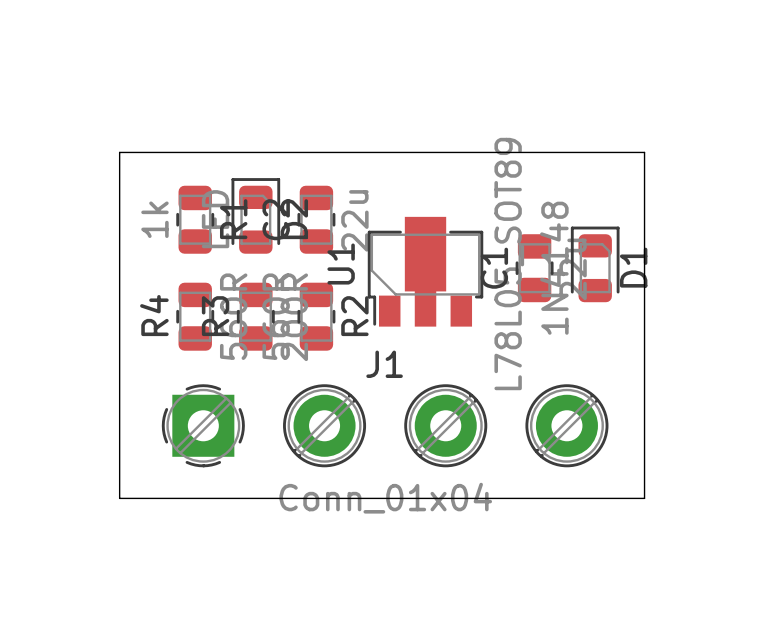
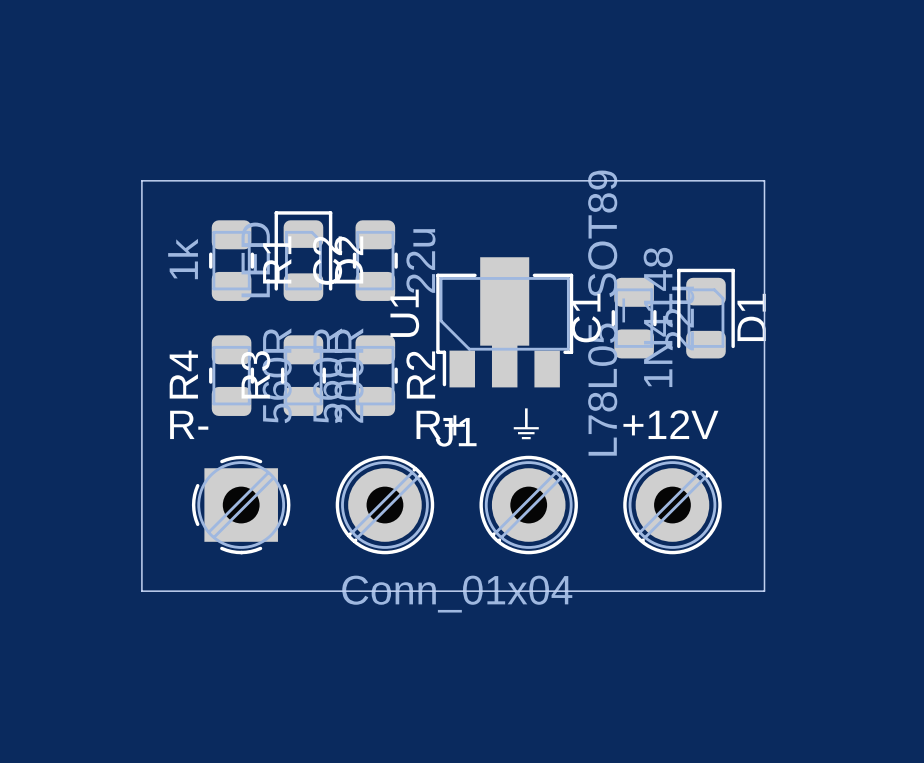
text: none -> R- (189, 424)
text: none -> R+ (440, 424)
text: none -> ⏚ (526, 423)
text: none -> +12V (670, 424)

